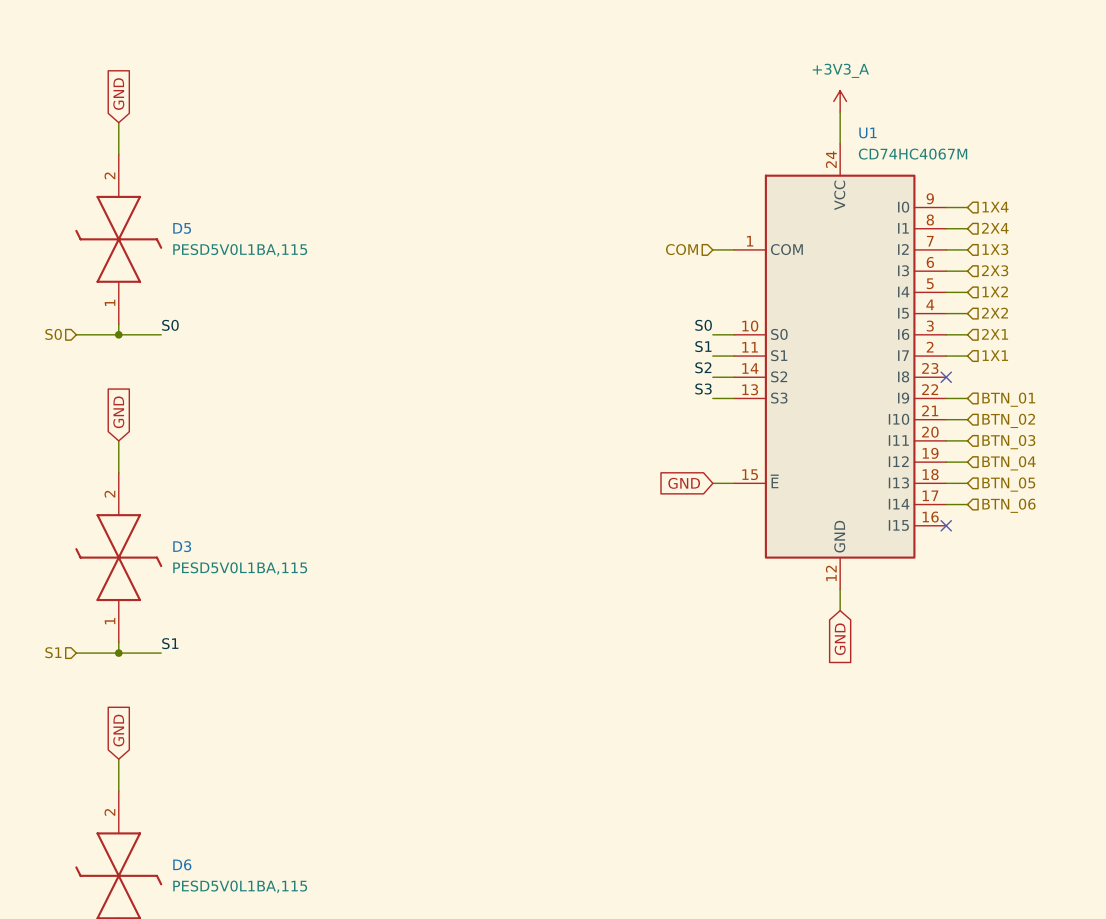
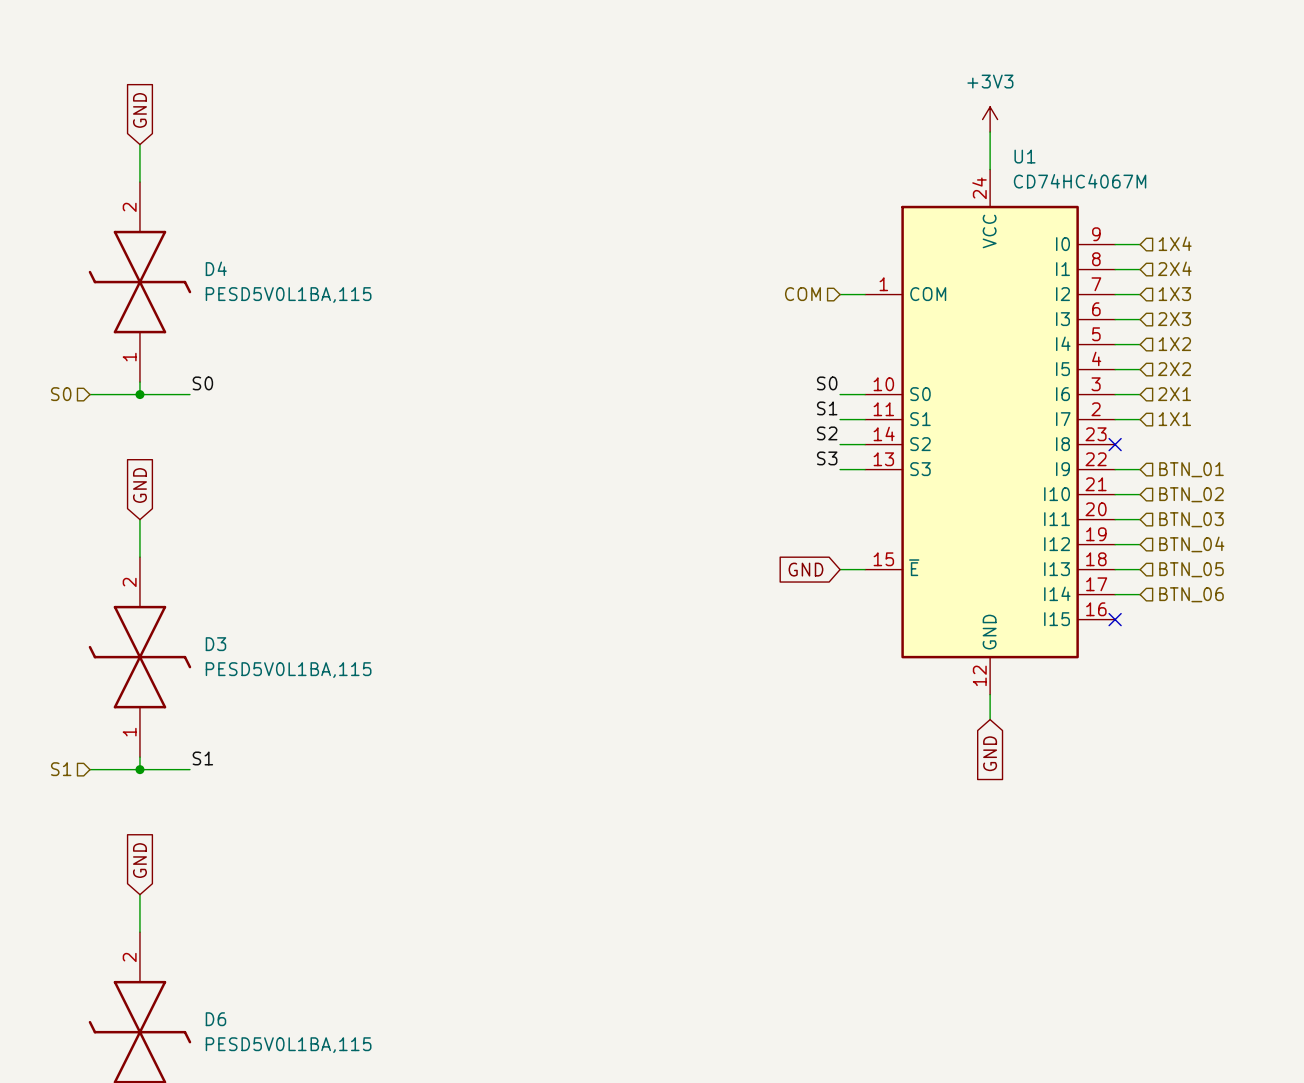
power symbol: +3V3_A (840, 101) -> +3V3 (990, 119)
D5 name: D5 (182, 228) -> D4 (216, 268)

